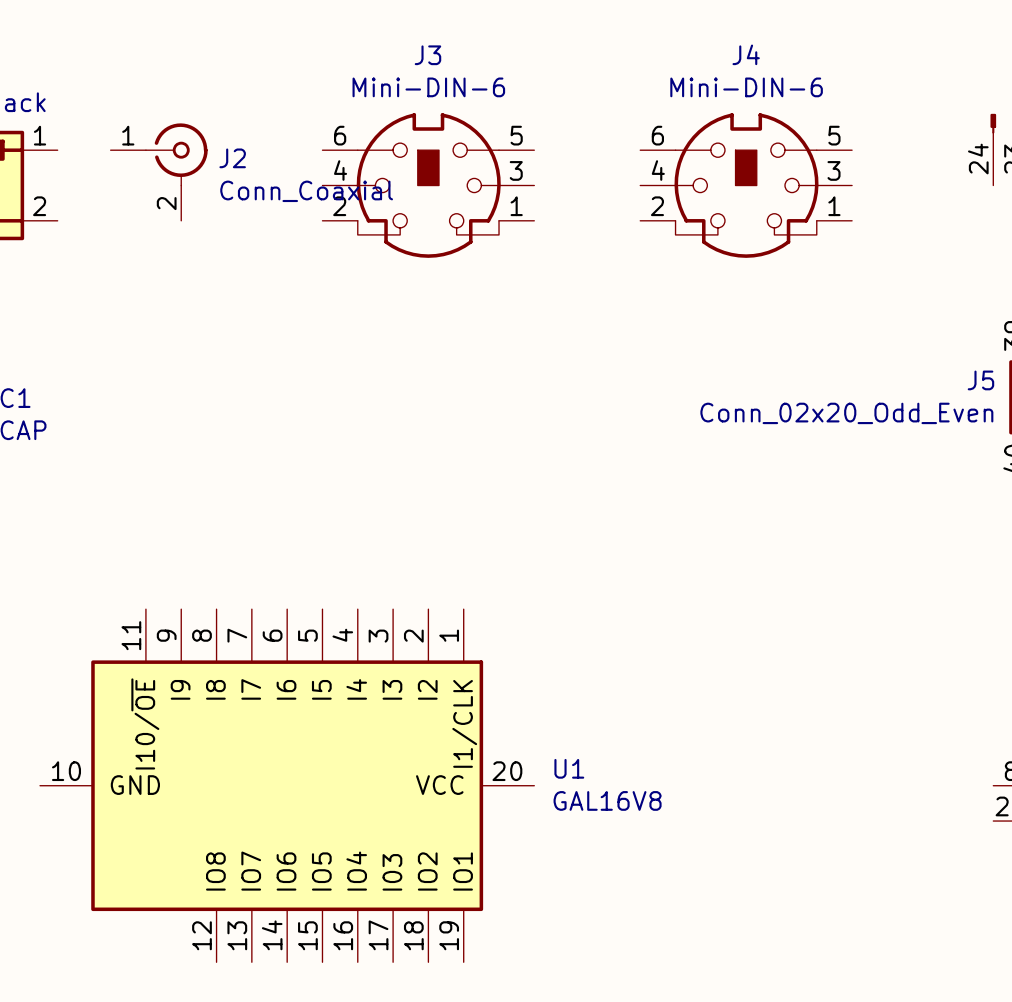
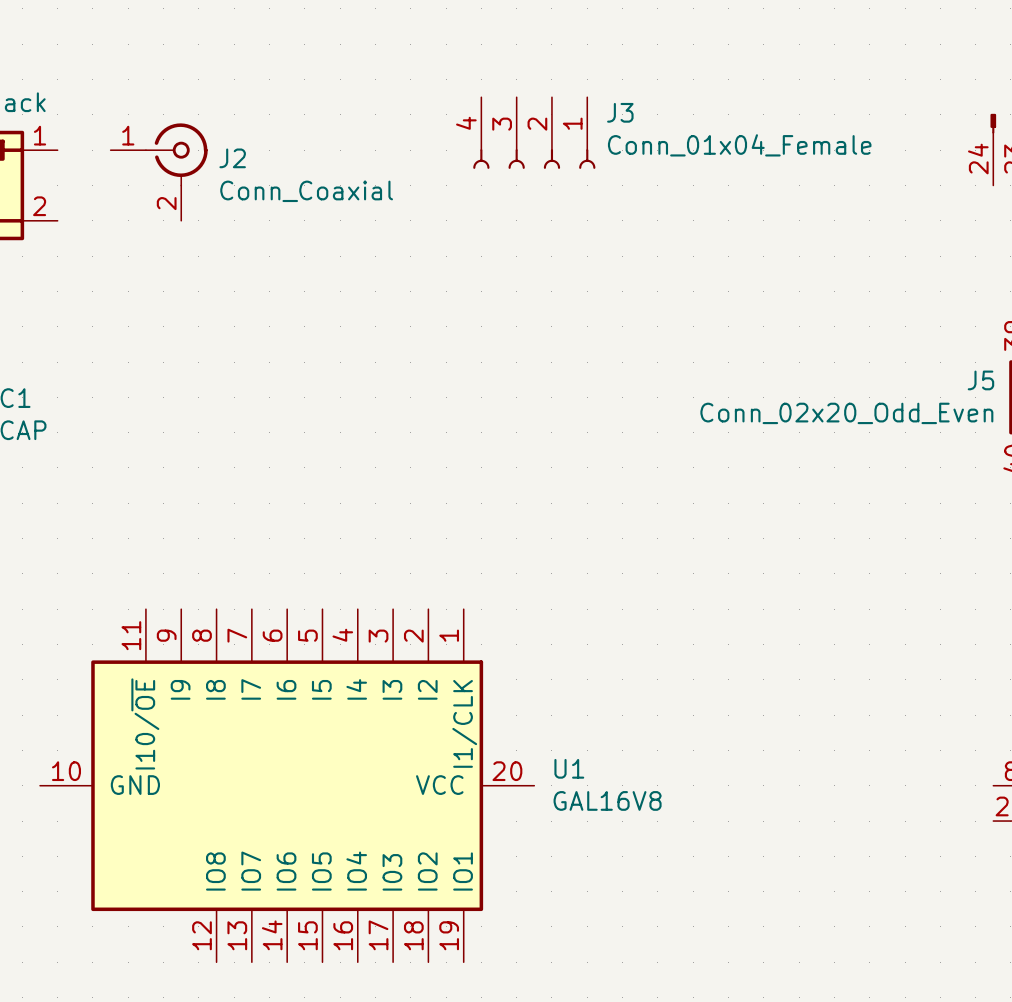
J3 name position: J3 (427, 55) -> J3 (620, 112)
J3 value: Mini-DIN-6 (428, 87) -> Conn_01x04_Female (739, 145)
J3 symbol: [322, 113, 535, 258] -> [473, 97, 596, 169]
J4: Mini-DIN-6 (746, 185) -> none

